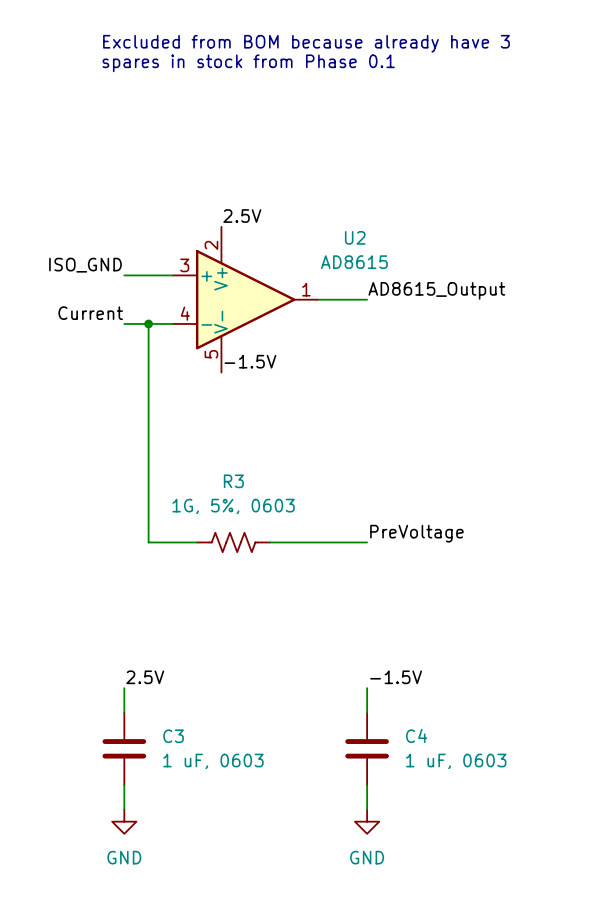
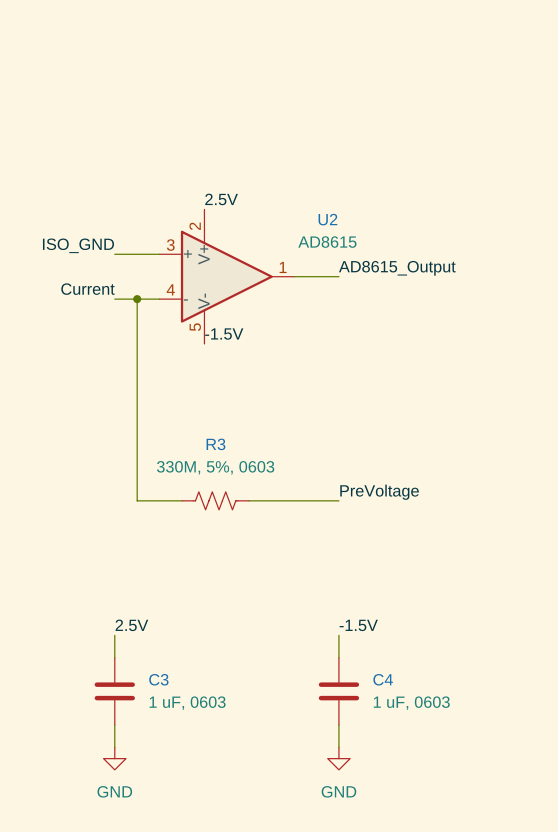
text: Excluded from BOM because already have 3 (306, 43) -> none
text: spares in stock from Phase 0.1 (248, 63) -> none
R3 value: 1G, 5%, 0603 (233, 506) -> 330M, 5%, 0603 (215, 467)

